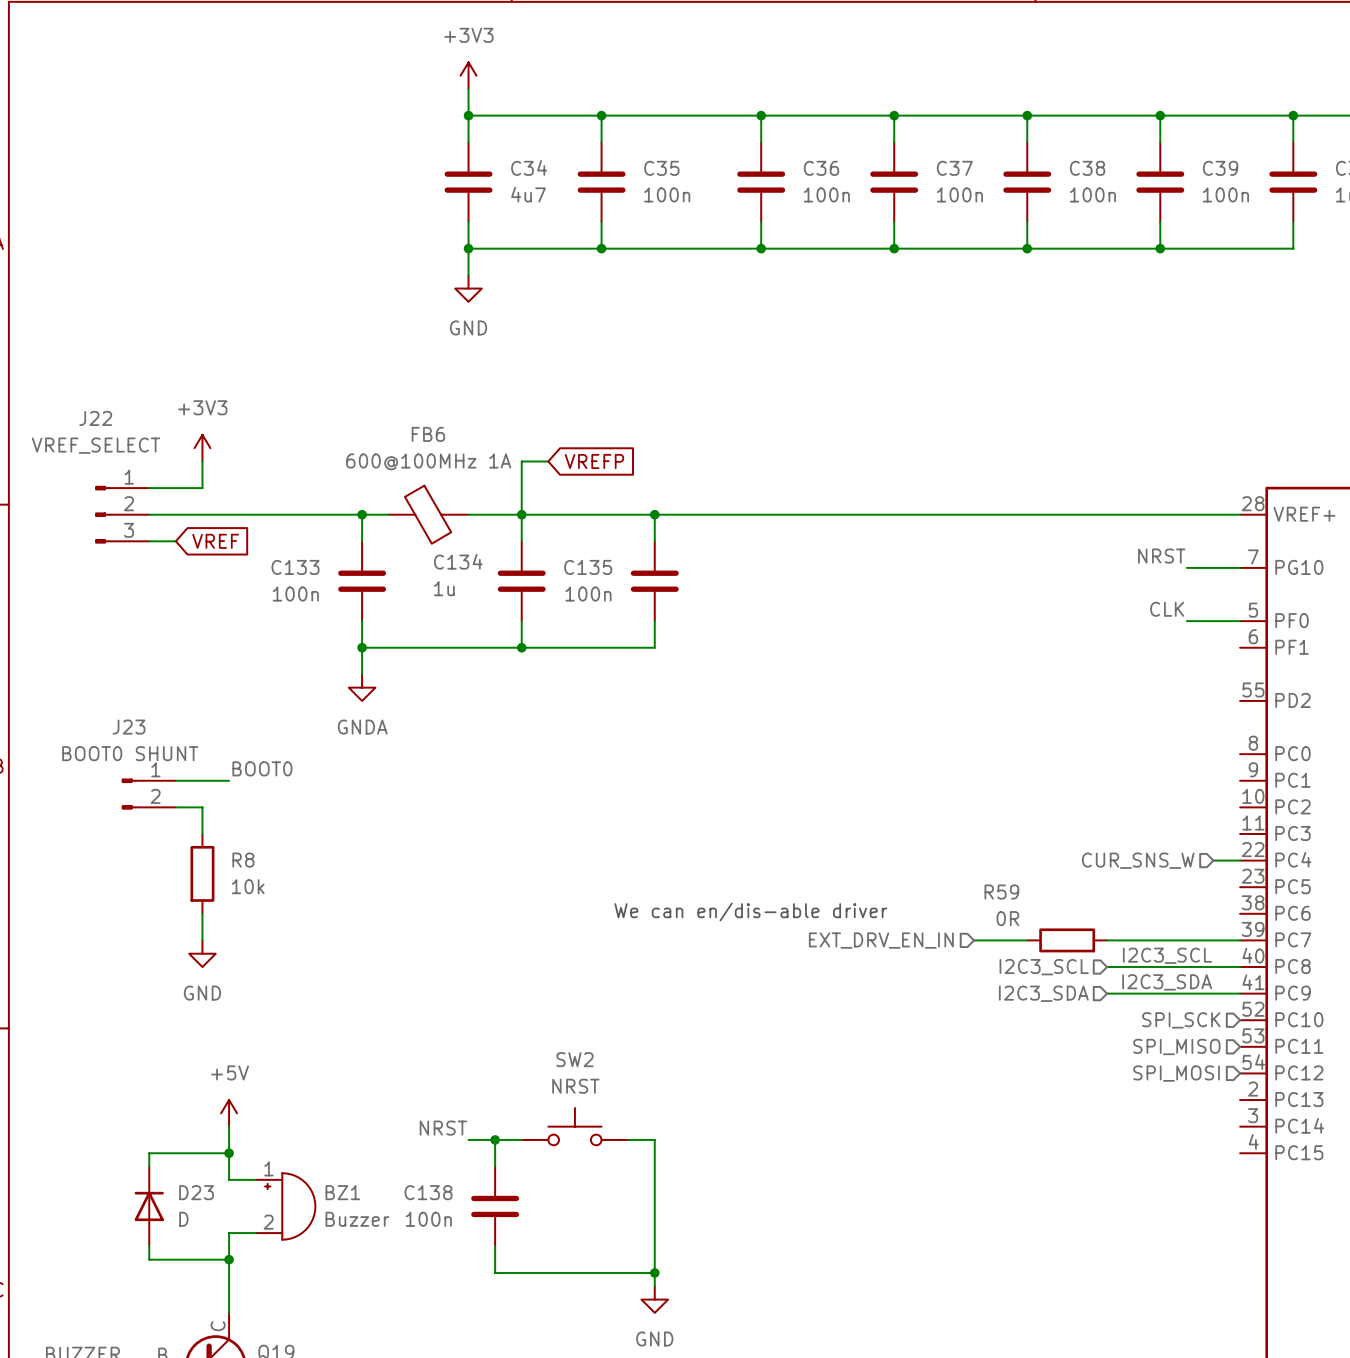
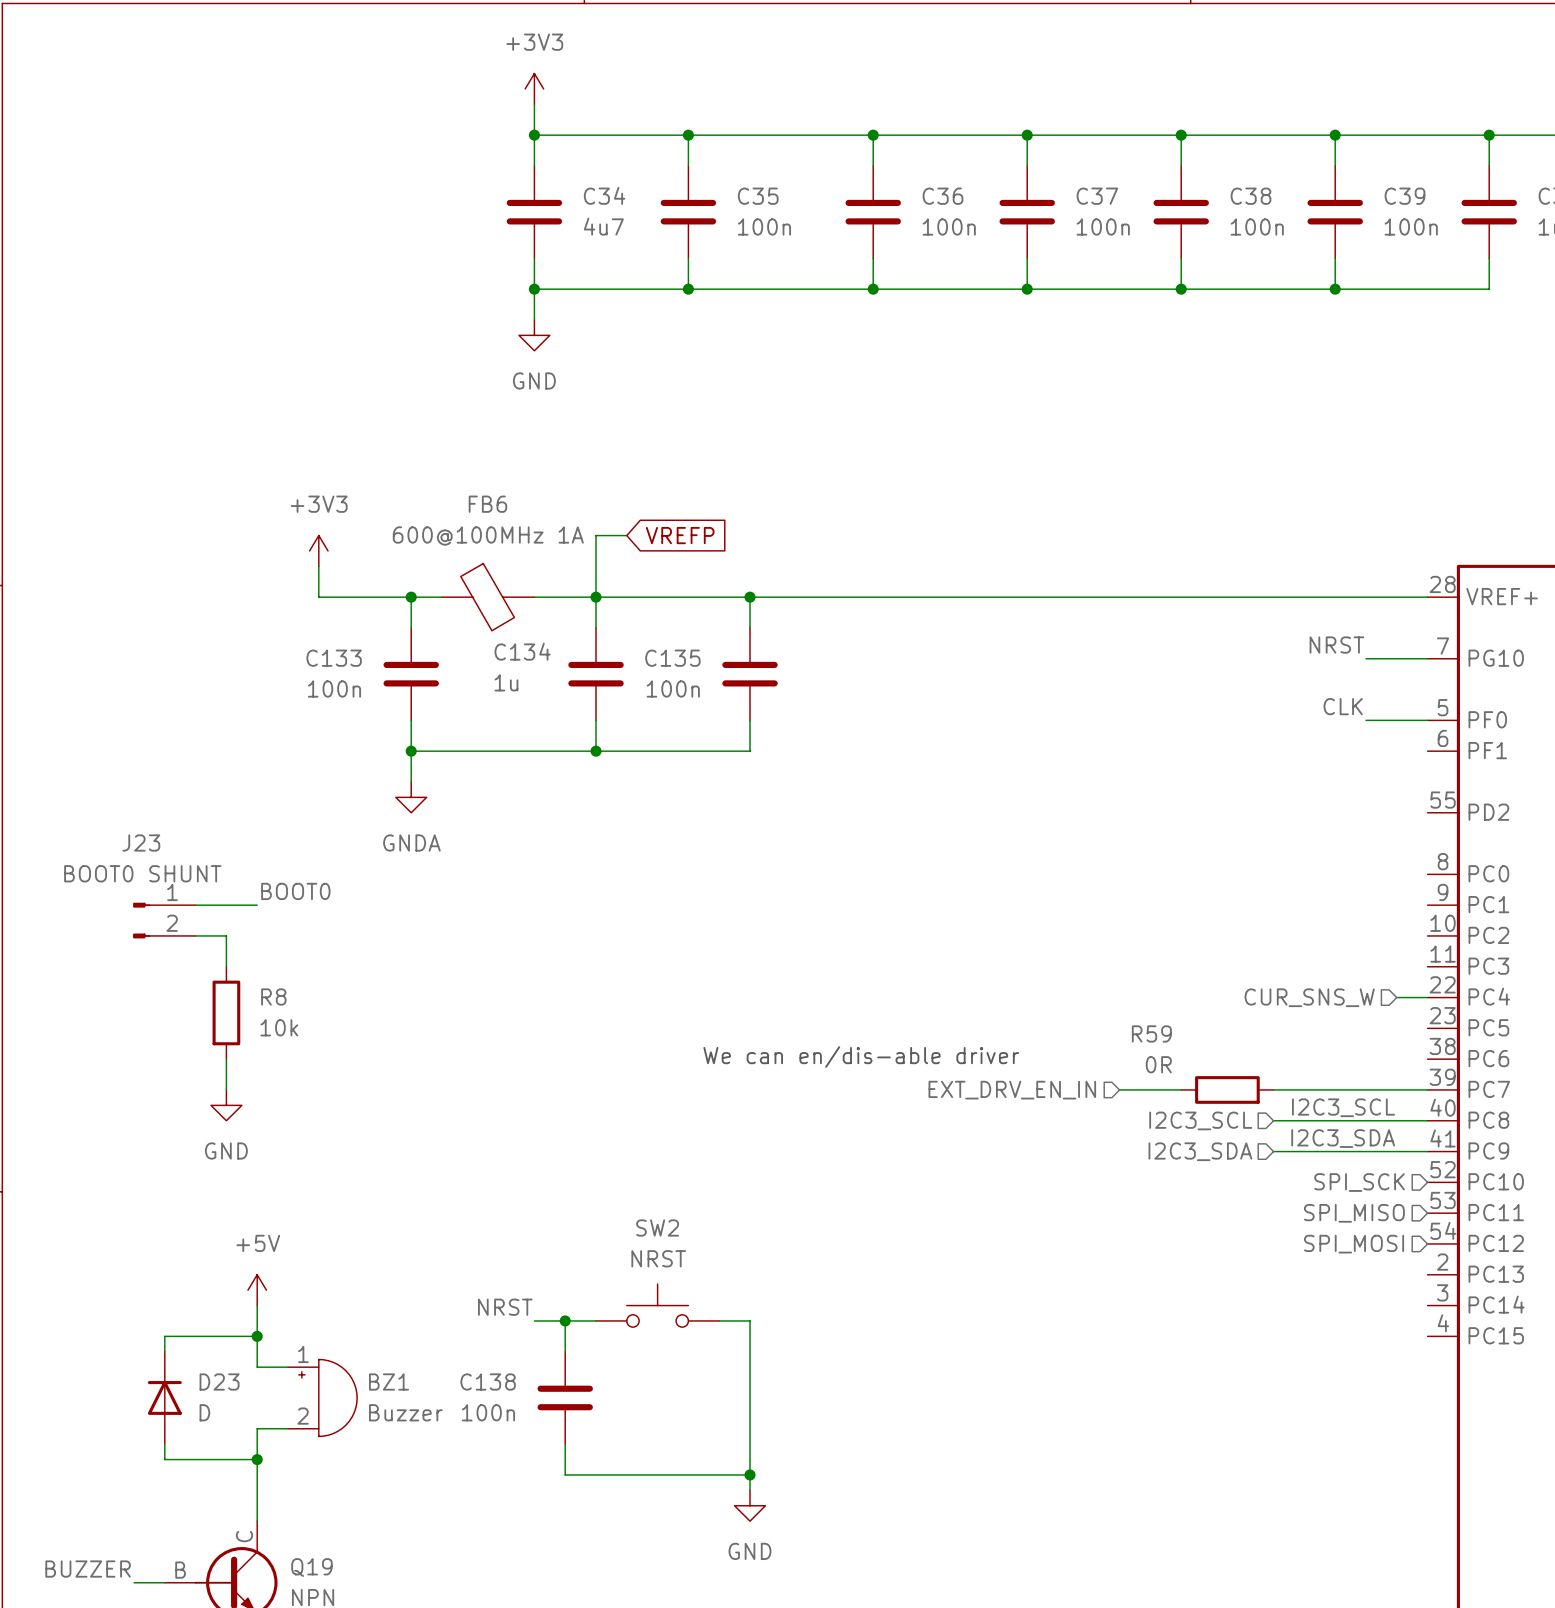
power symbol position: +3V3 (202, 448) -> +3V3 (318, 550)
wire: (202, 461) (202, 488) (149, 488) -> none
J22: VREF_SELECT (122, 514) -> none
wire: (149, 514) (282, 514) -> (318, 566) (318, 597)
wire: (149, 541) (175, 541) -> none
global label: VREF (215, 541) -> none

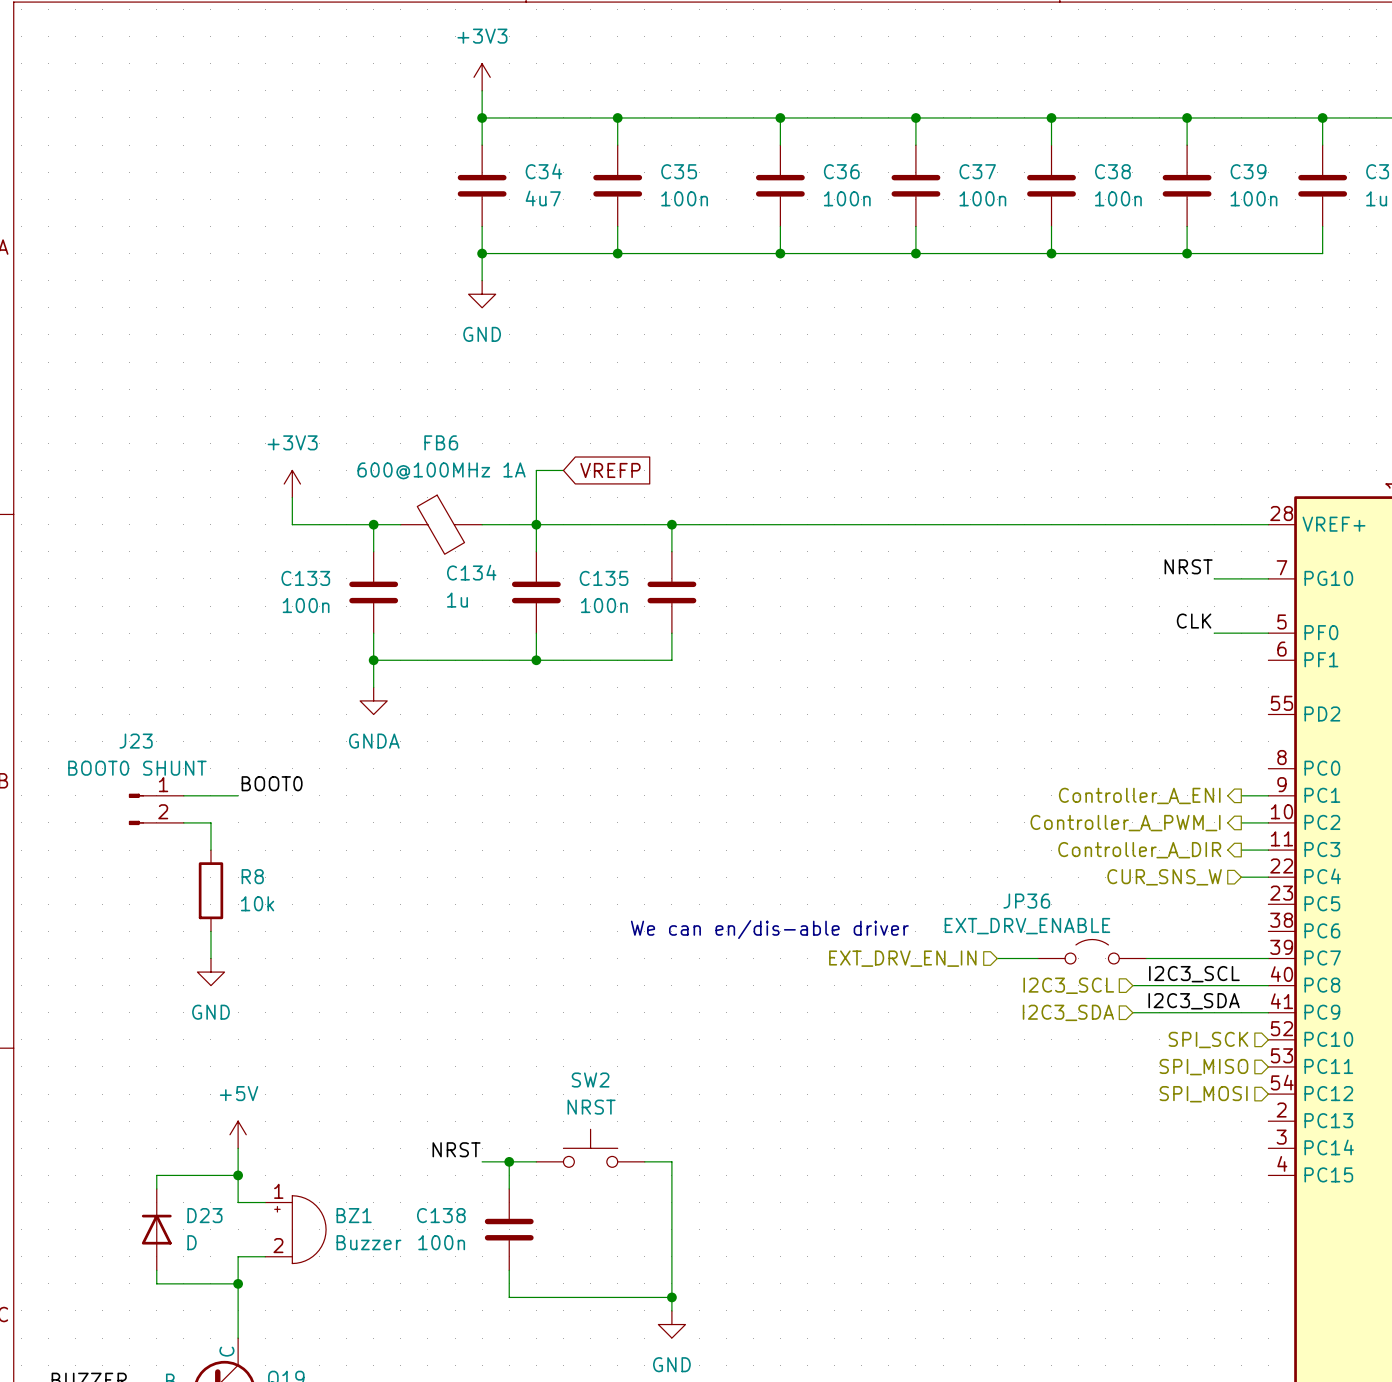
hierarchical label: none -> Controller_A_ENI (1139, 795)
wire: none -> (1241, 795) (1268, 795)
wire: none -> (1241, 822) (1268, 822)
hierarchical label: none -> Controller_A_PWM_I (1125, 823)
hierarchical label: none -> Controller_A_DIR (1139, 850)
wire: none -> (1241, 850) (1268, 850)
JP36: none -> EXT_DRV_ENABLE (1092, 951)
R59: 0R (1227, 1089) -> none

